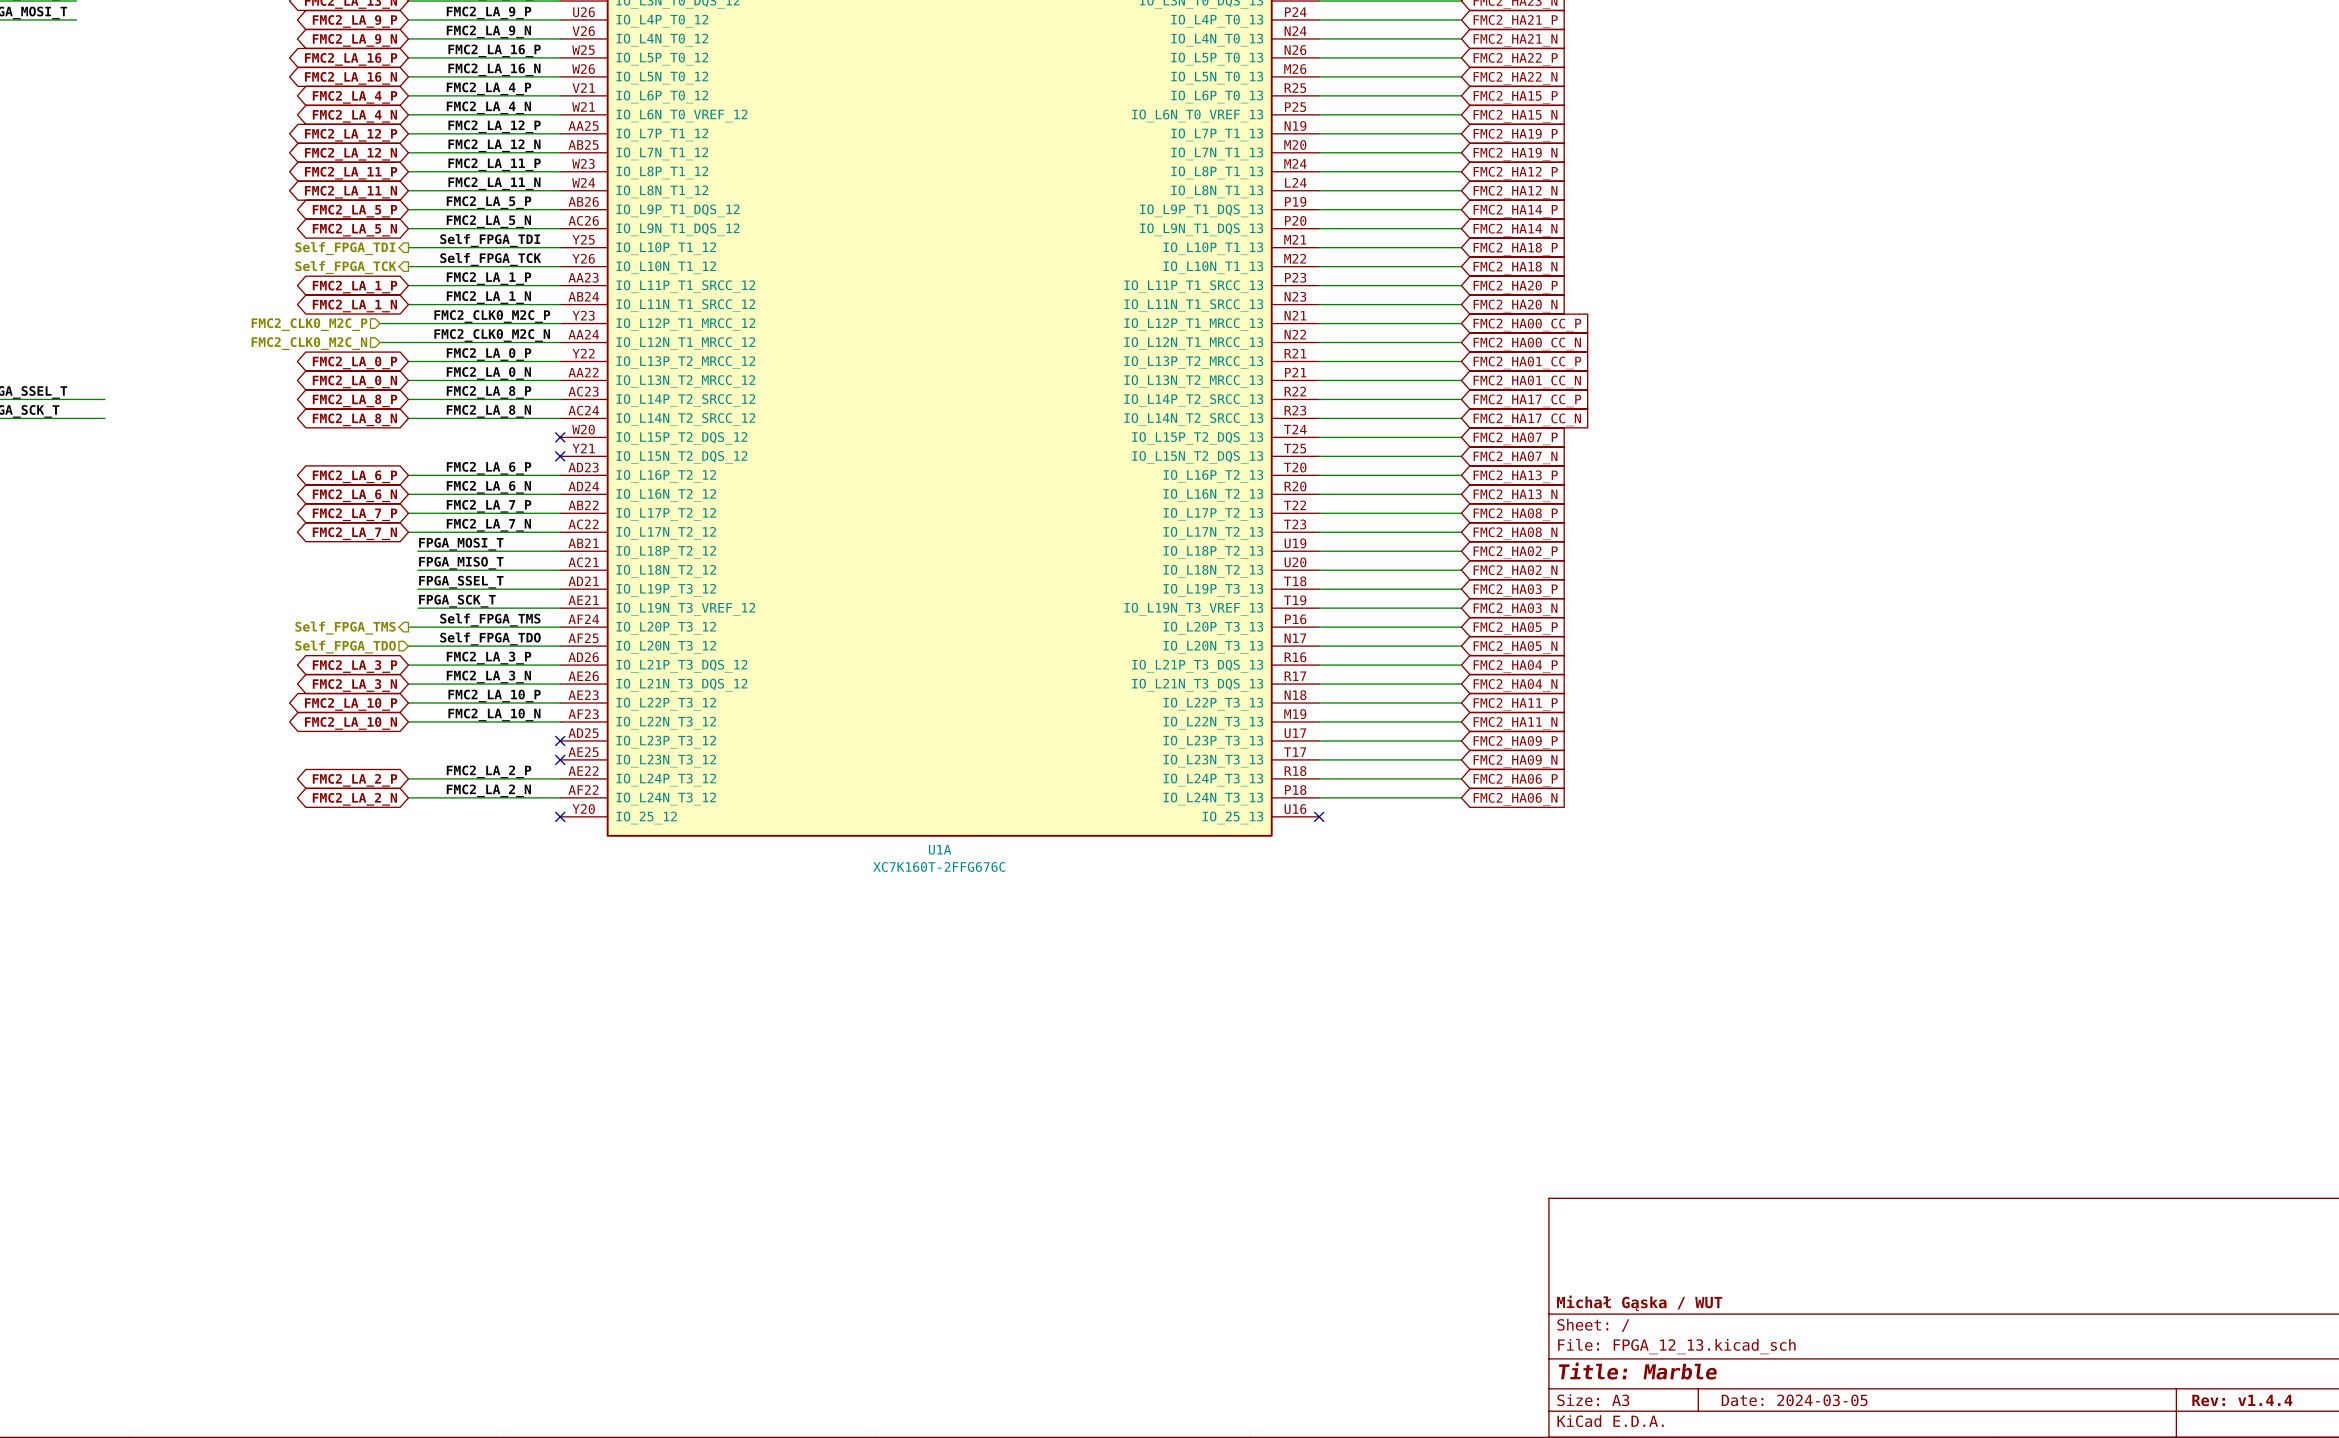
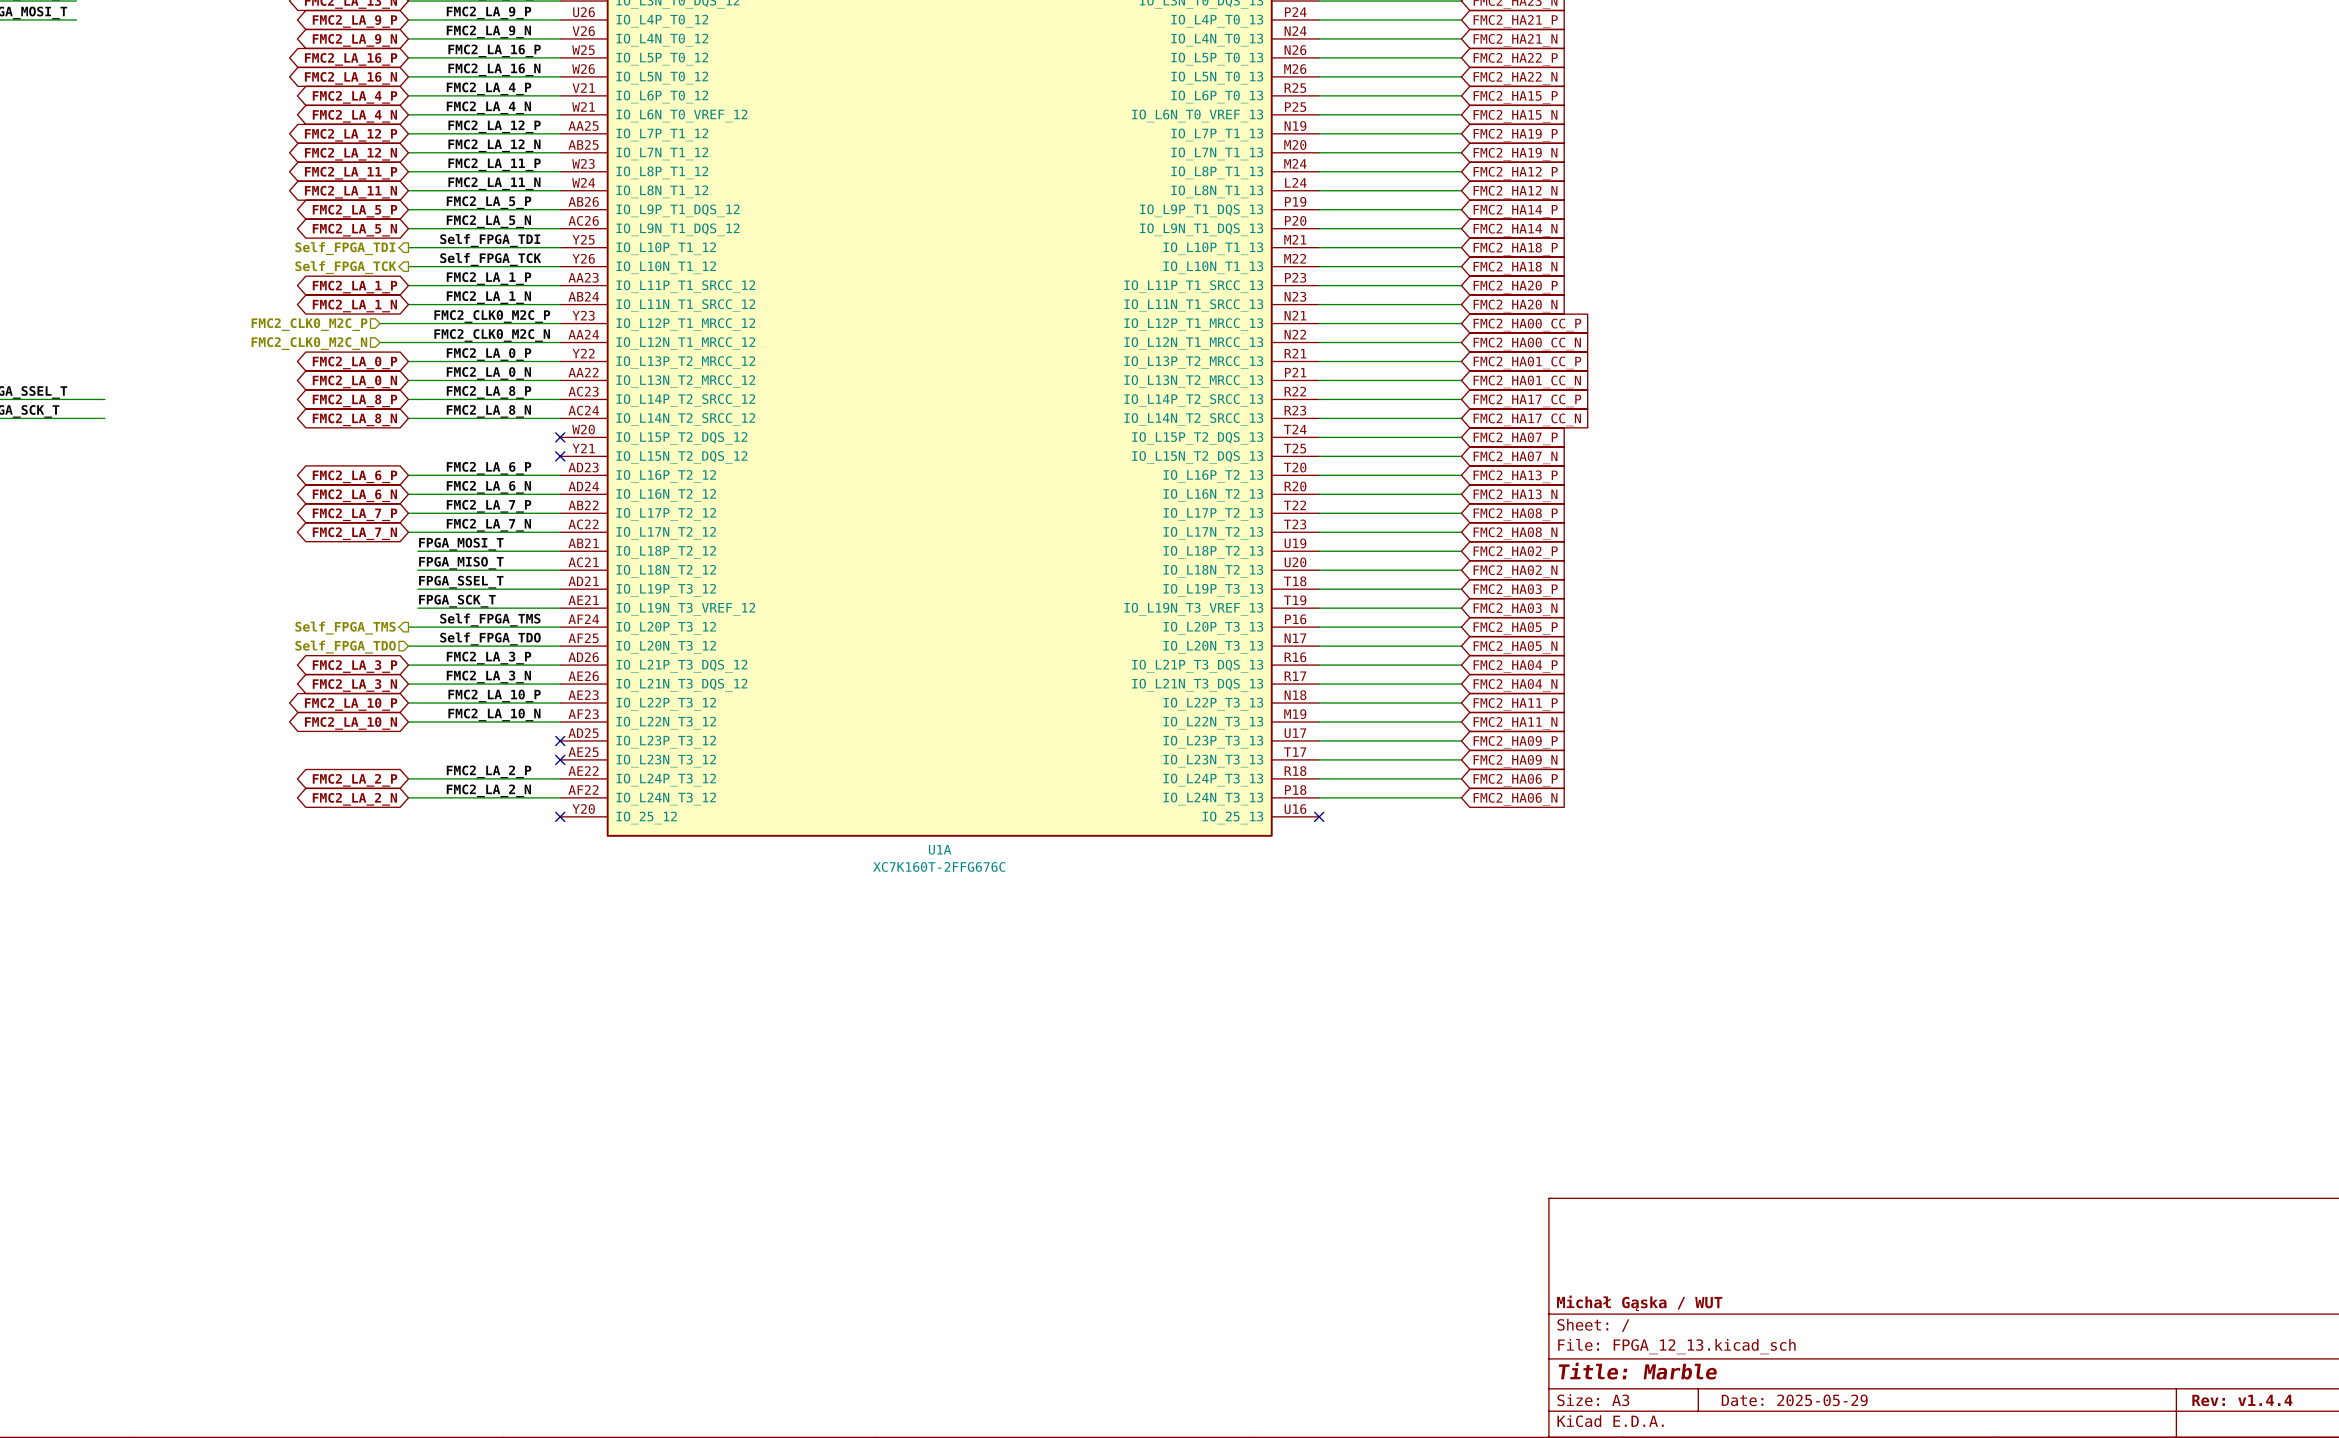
title block: Date: 2024-03-05 (1794, 1400) -> Date: 2025-05-29 (1794, 1400)

